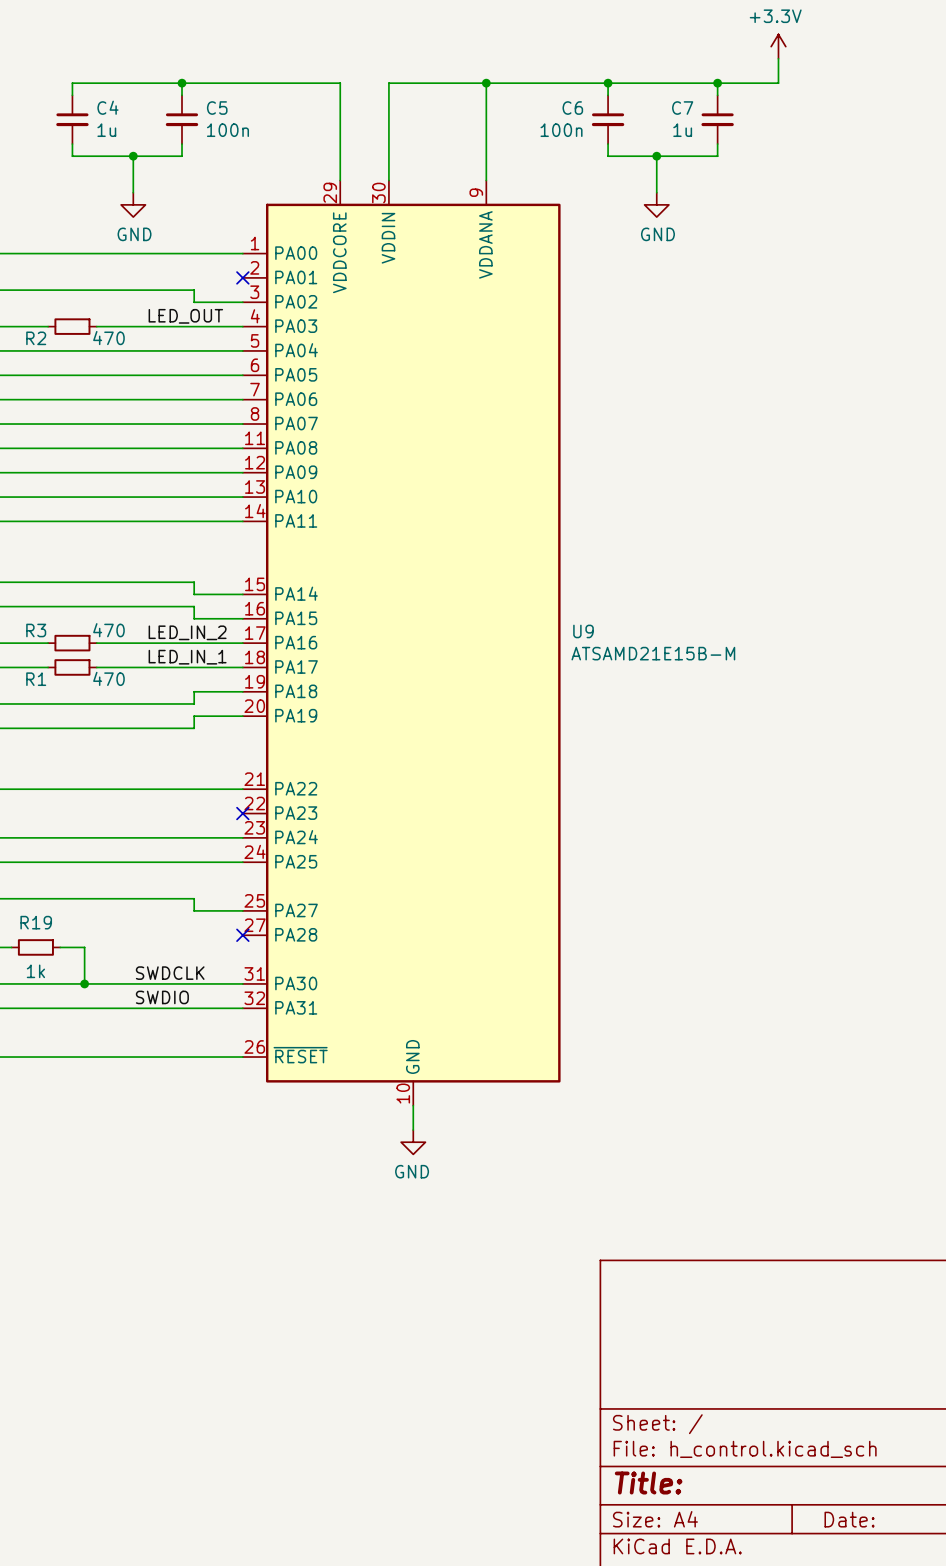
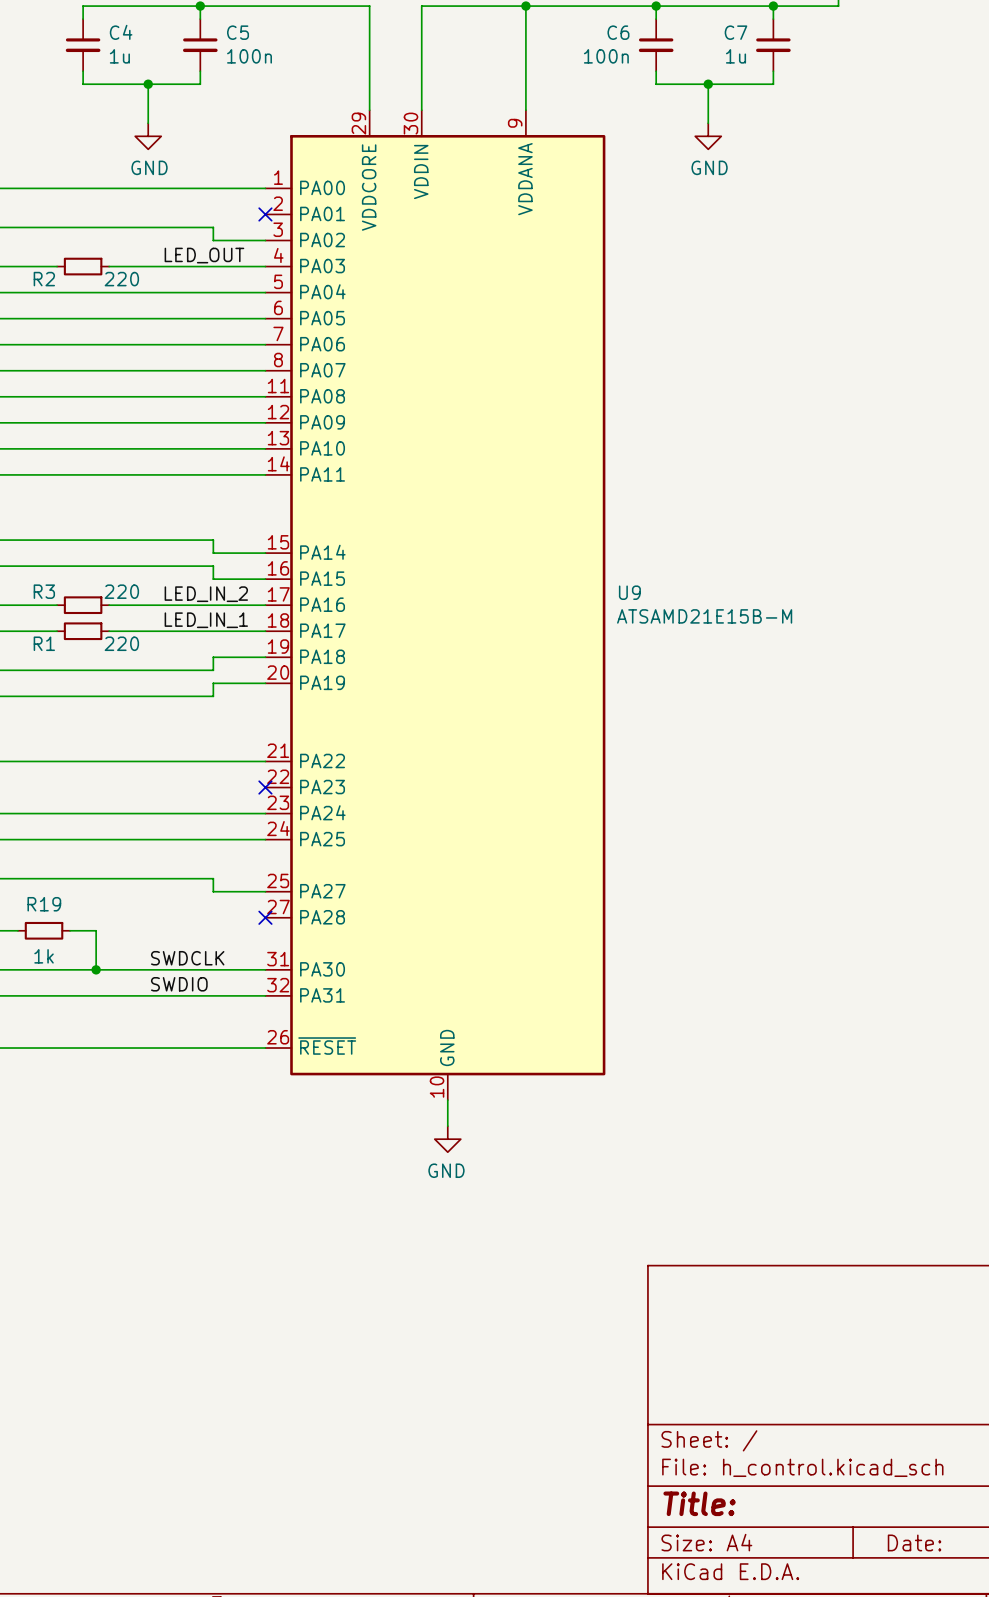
R2 value: 470 (108, 338) -> 220 (121, 279)
R3 value: 470 (108, 630) -> 220 (121, 591)
R1 value: 470 (108, 678) -> 220 (121, 643)

